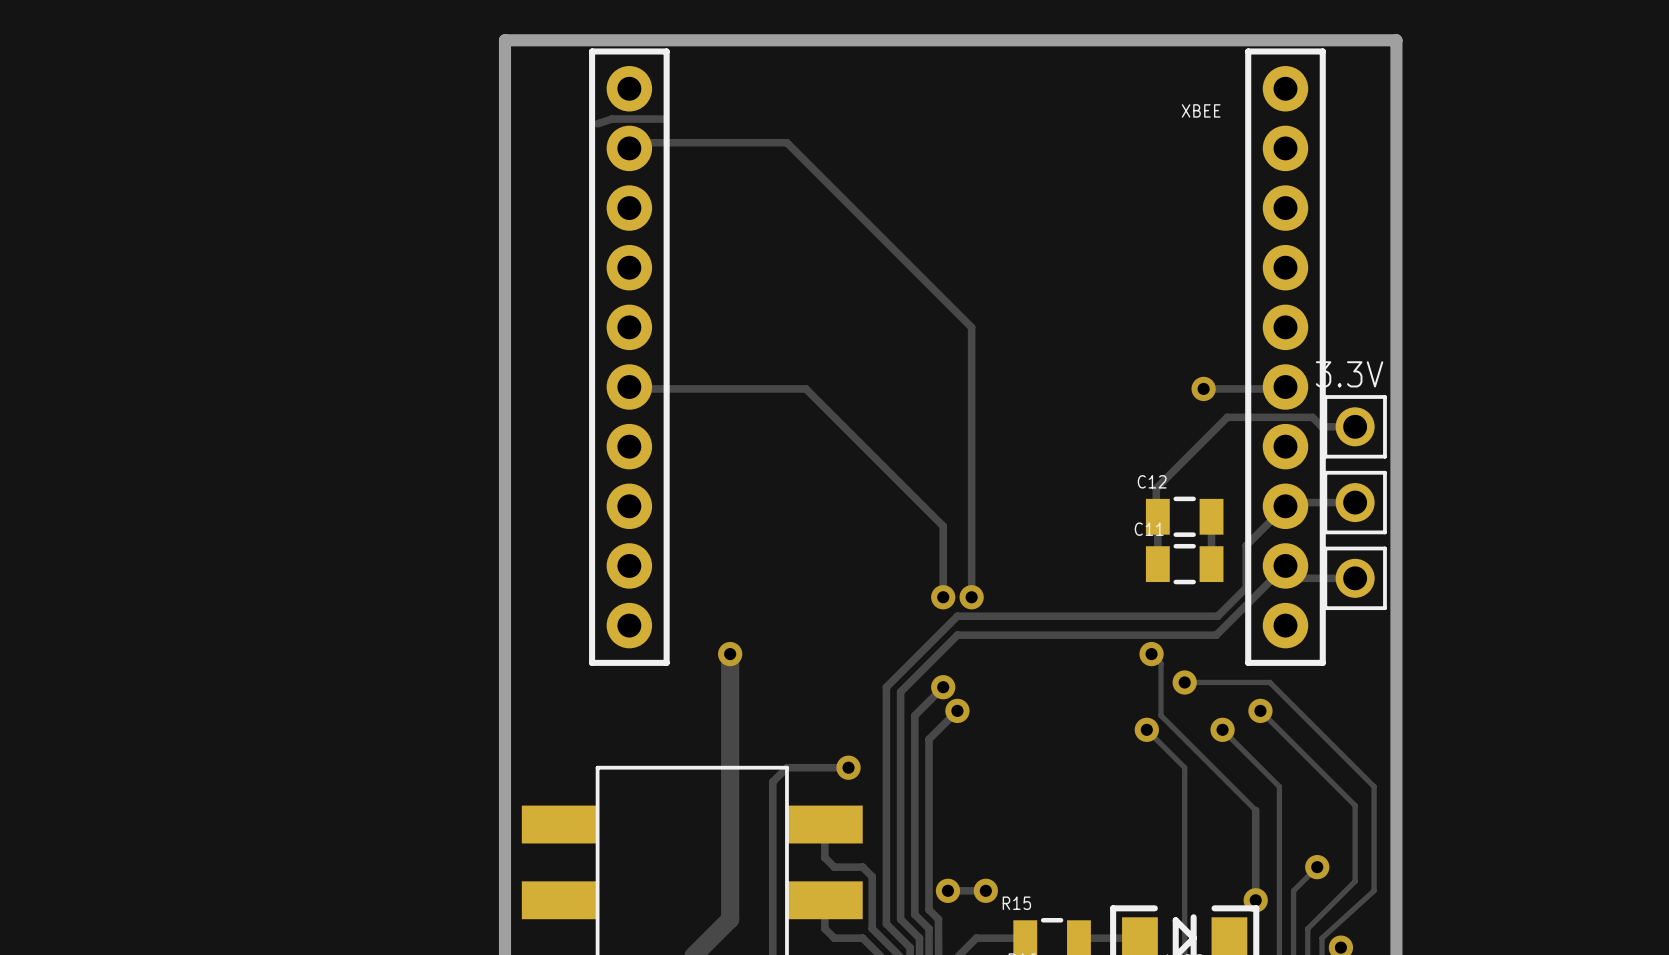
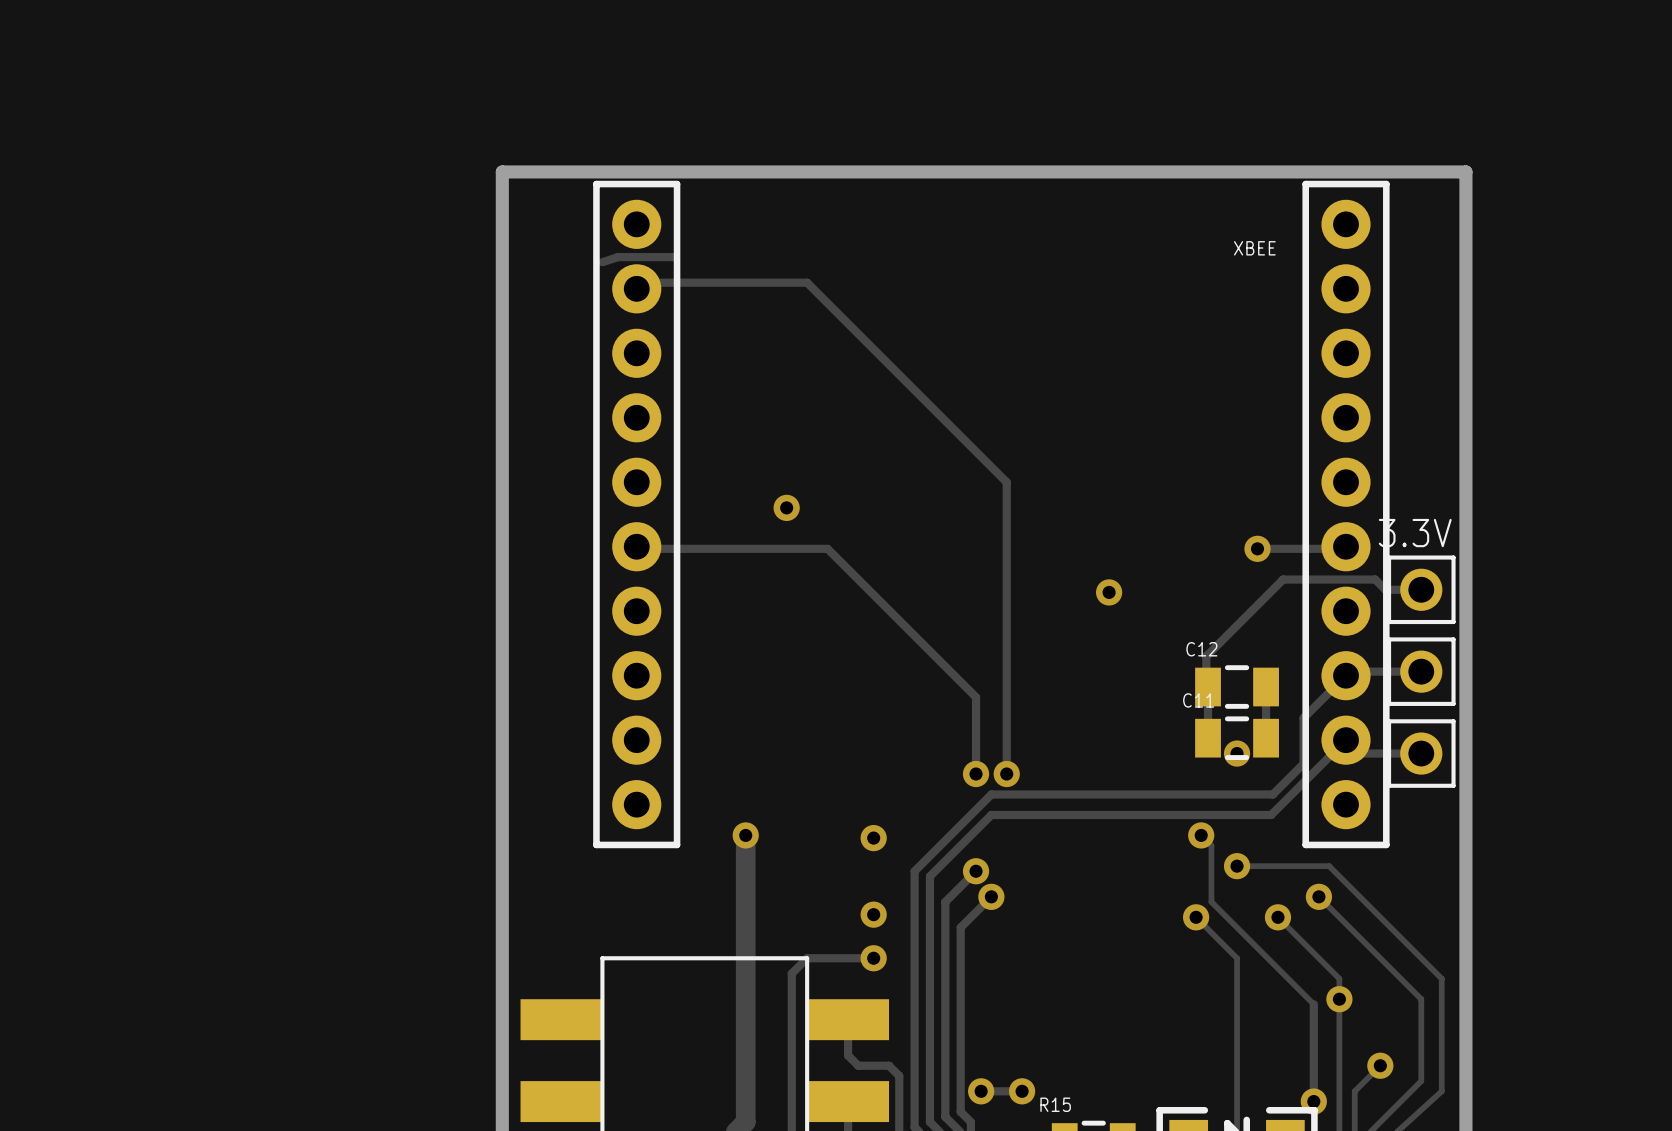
via: none -> (786, 507)
via: none -> (1109, 592)
via: none -> (1237, 753)
via: none -> (873, 838)
via: none -> (873, 914)
via: none -> (1339, 999)

